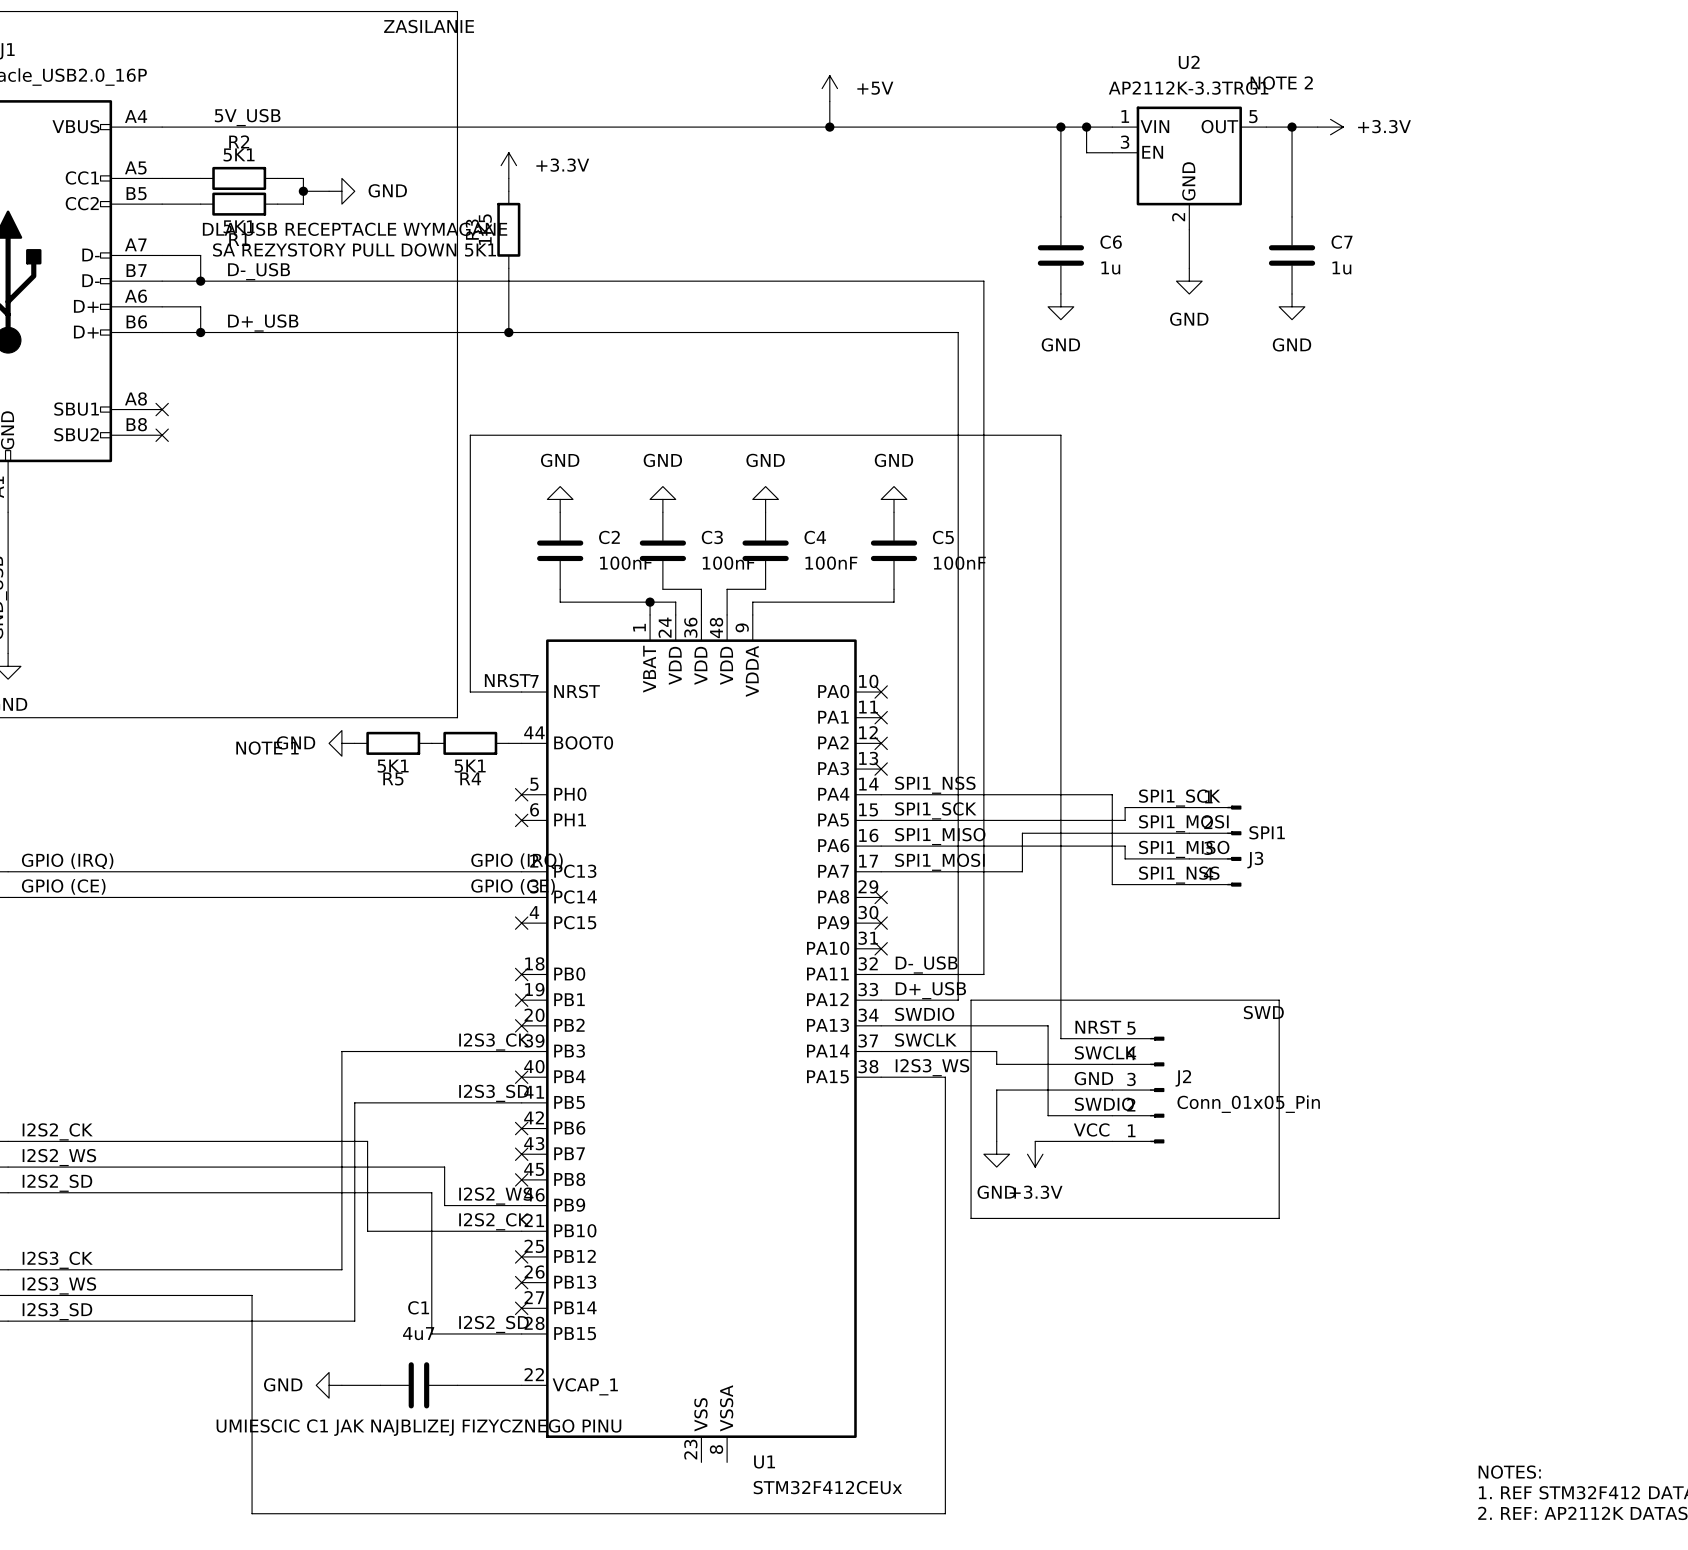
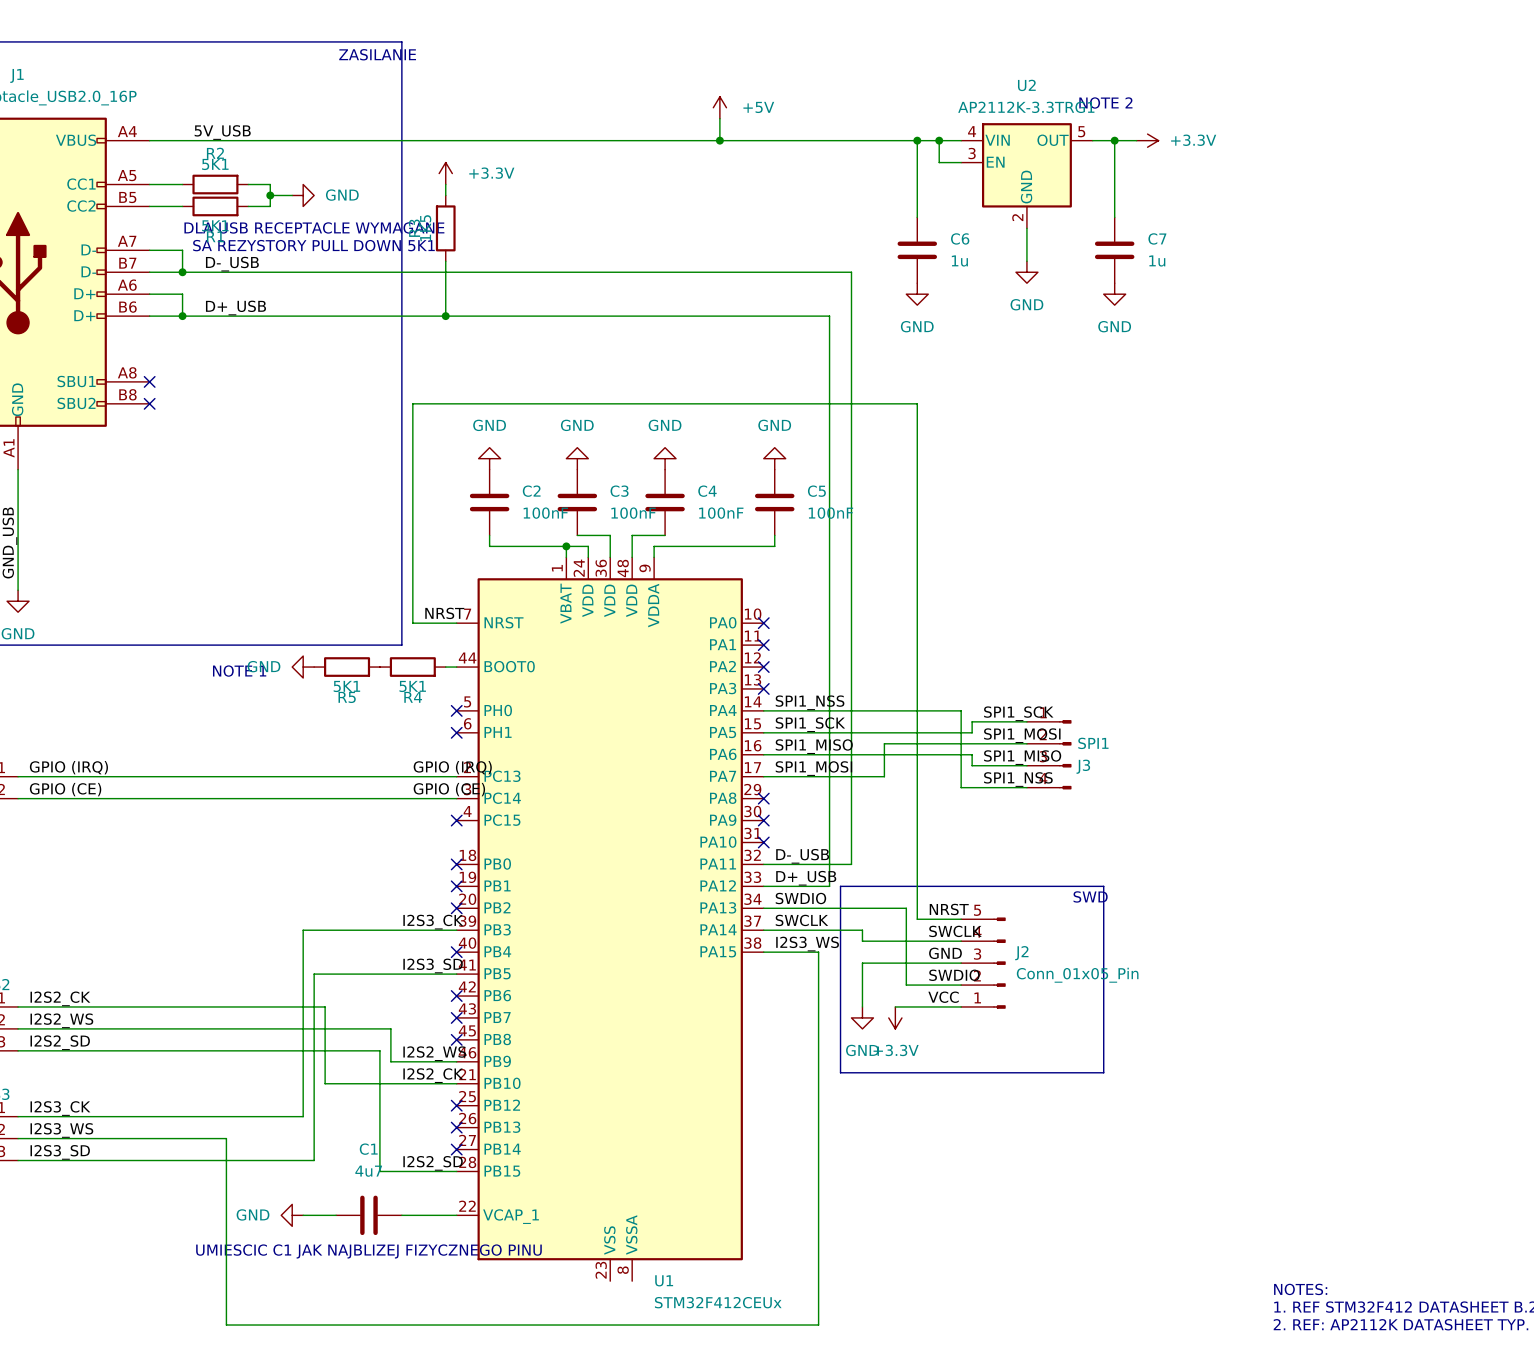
U2 pin number: 1 (1125, 116) -> 4 (972, 131)

